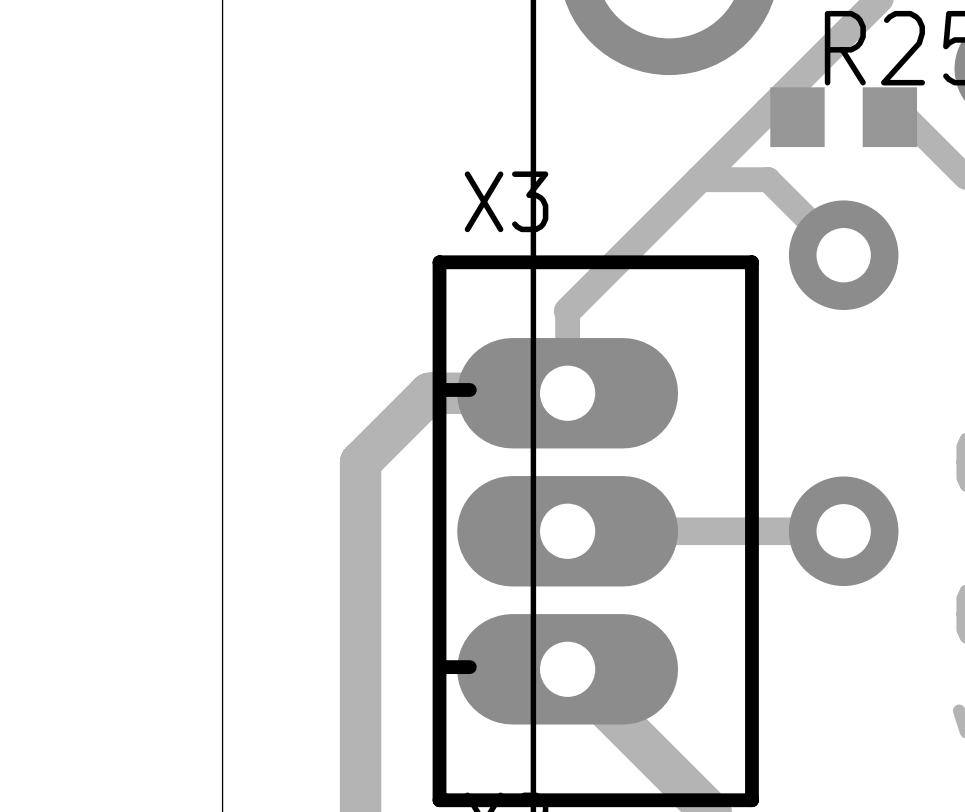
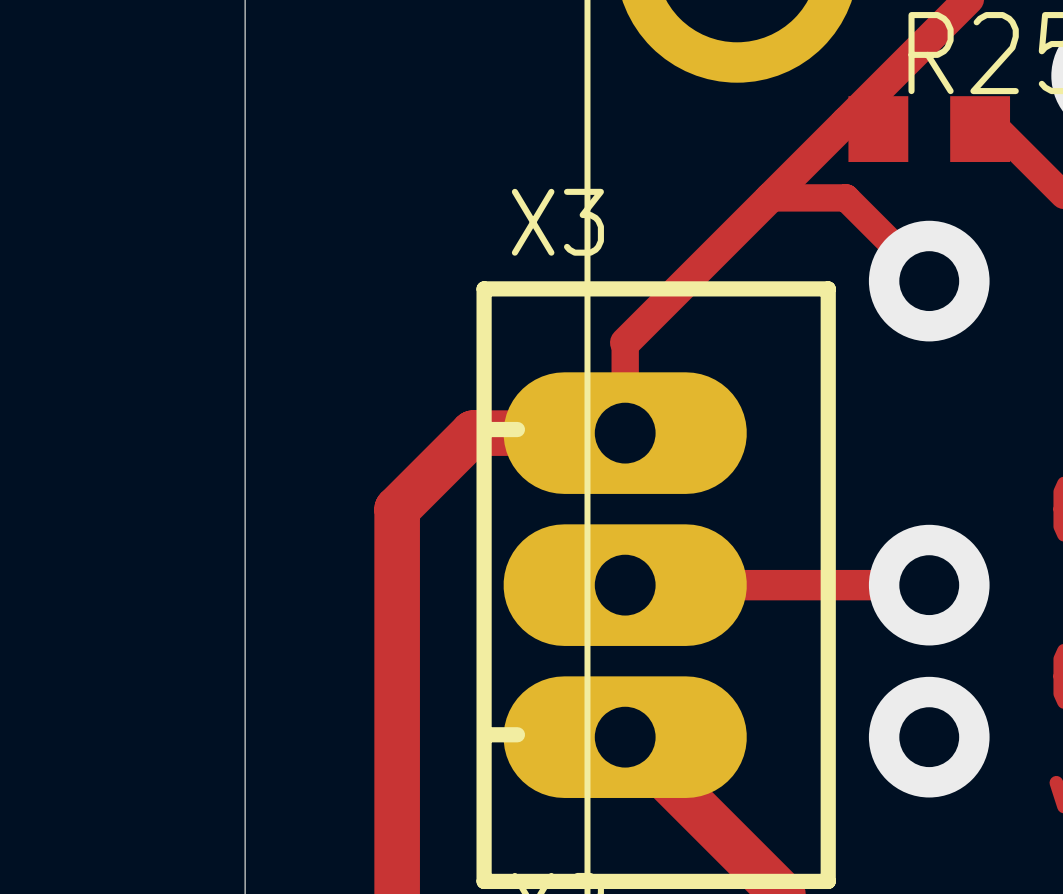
via: none -> (929, 737)

